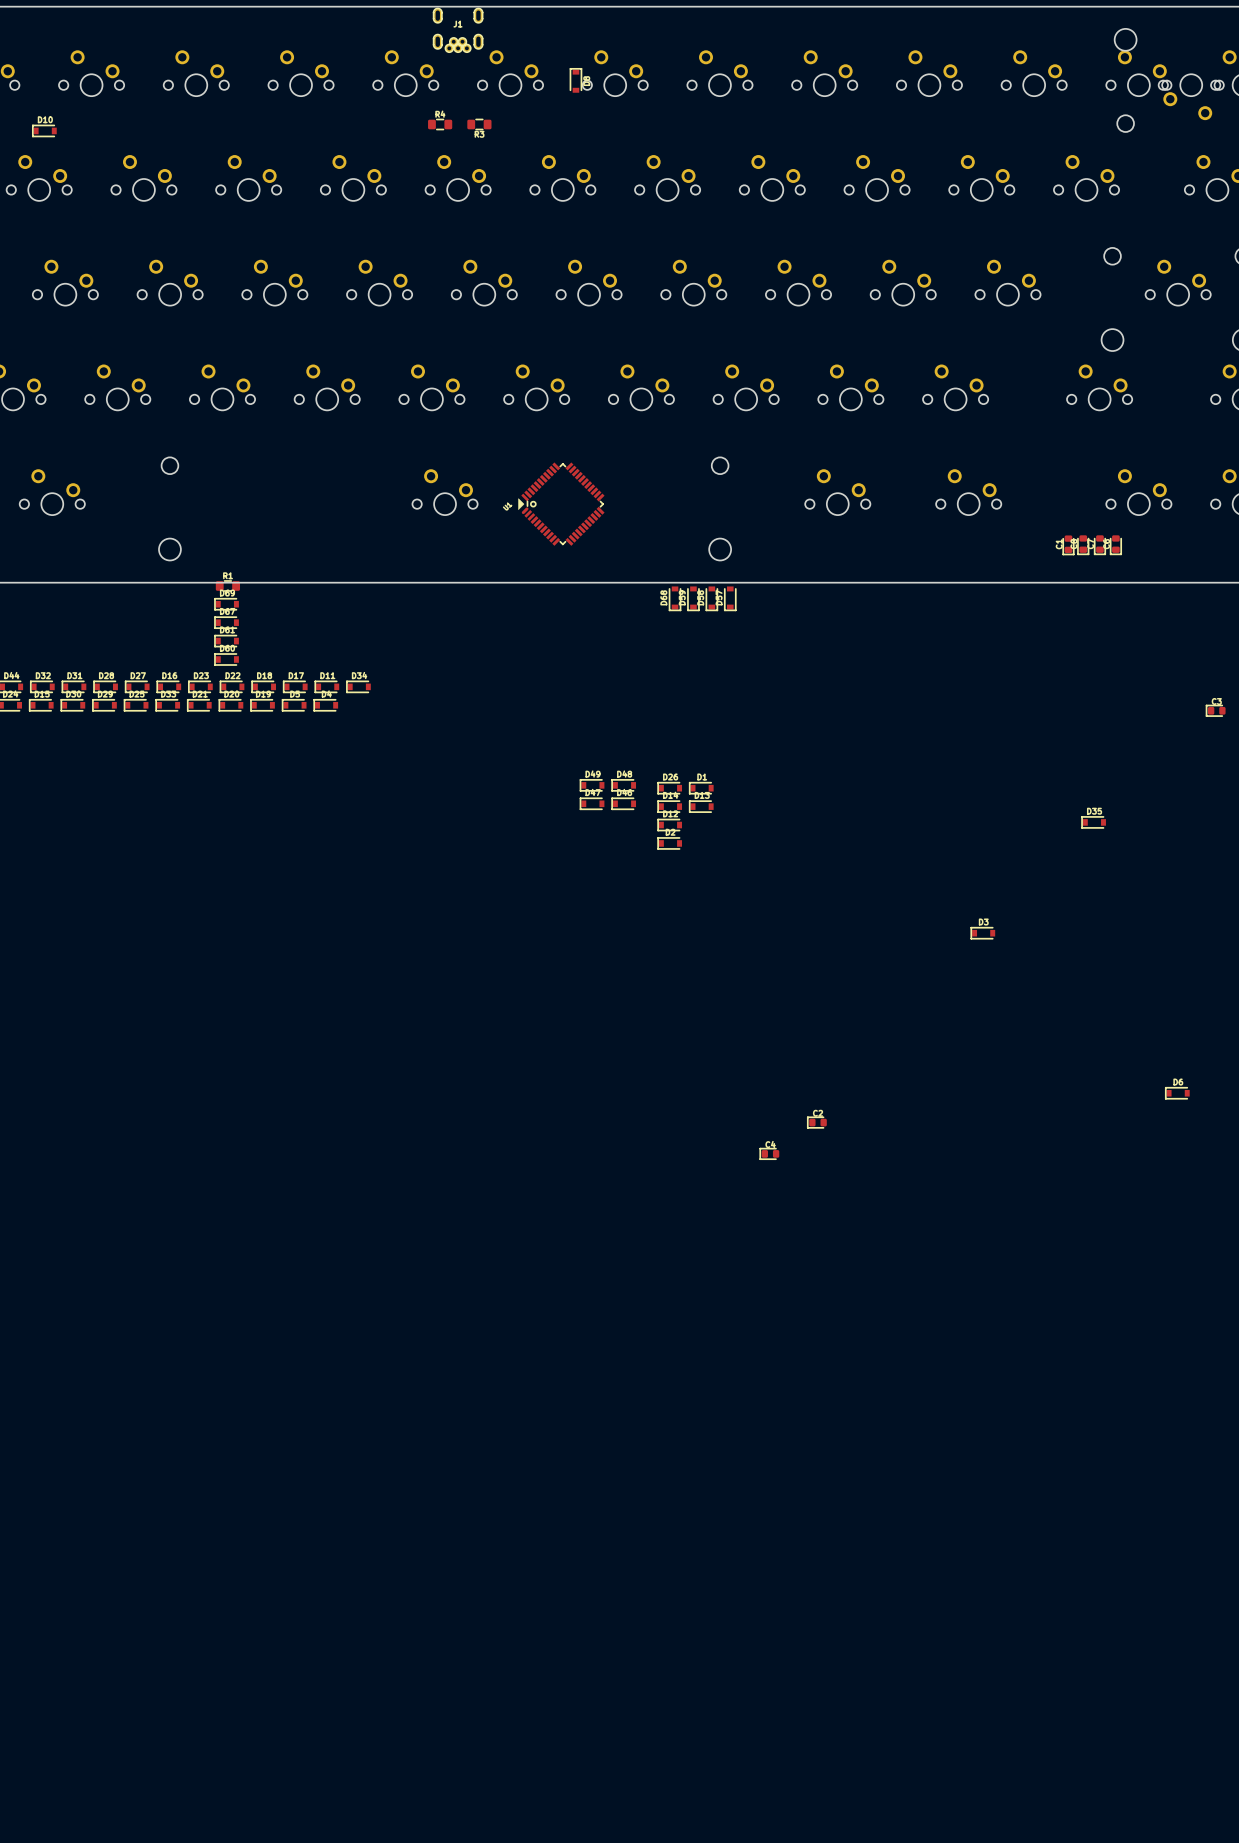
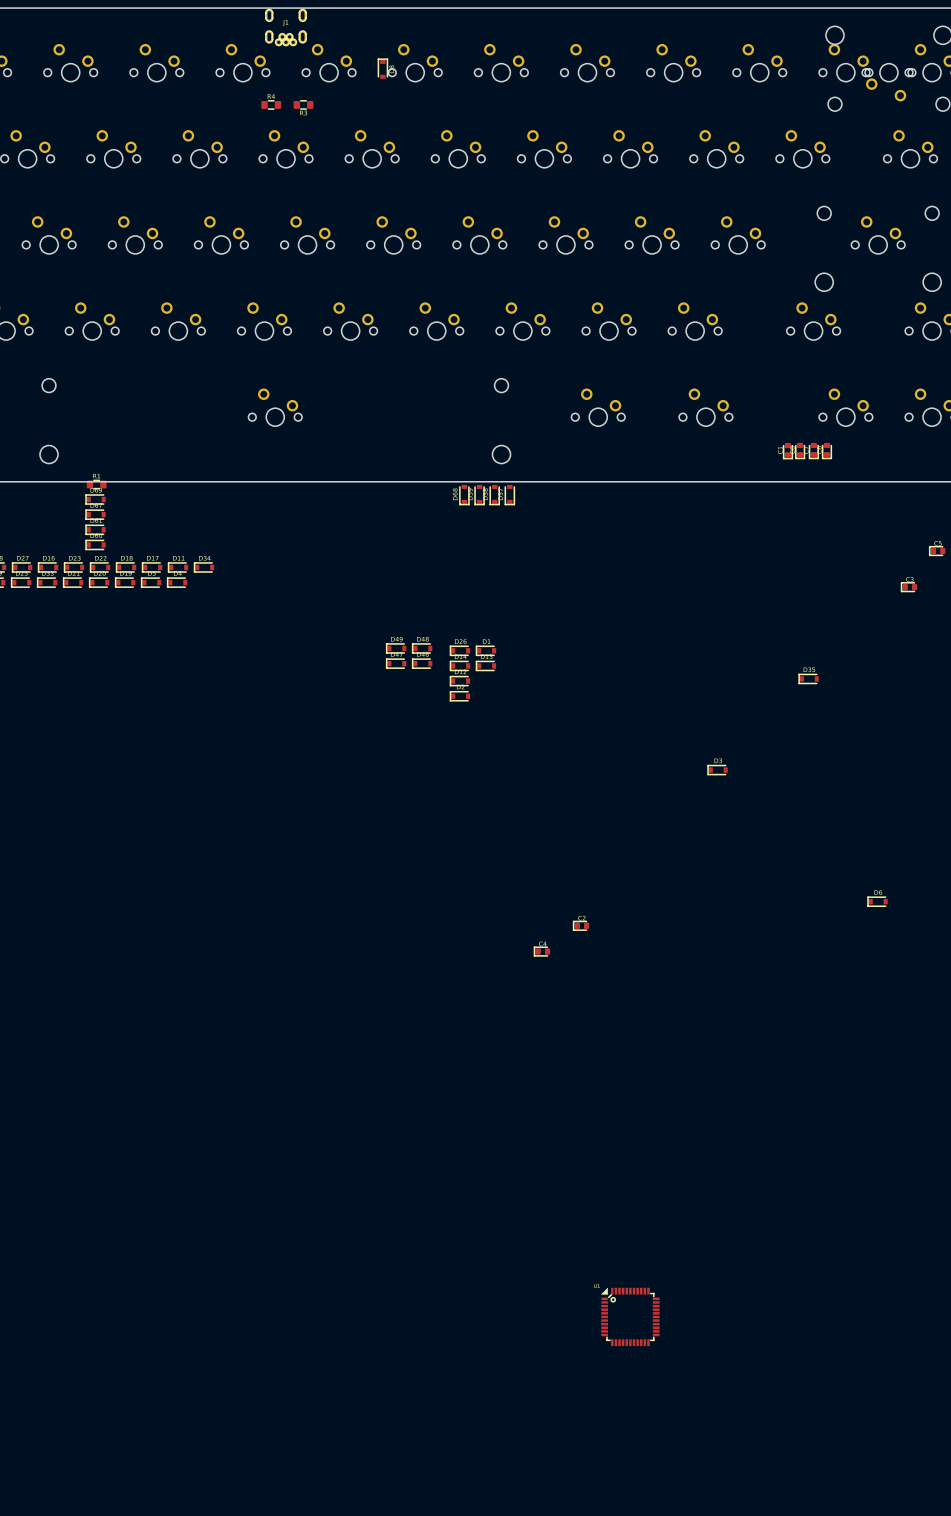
part rotation: 0° (561, 504) -> 45° clockwise (630, 1316)
part position: (561, 504) -> (630, 1316)

